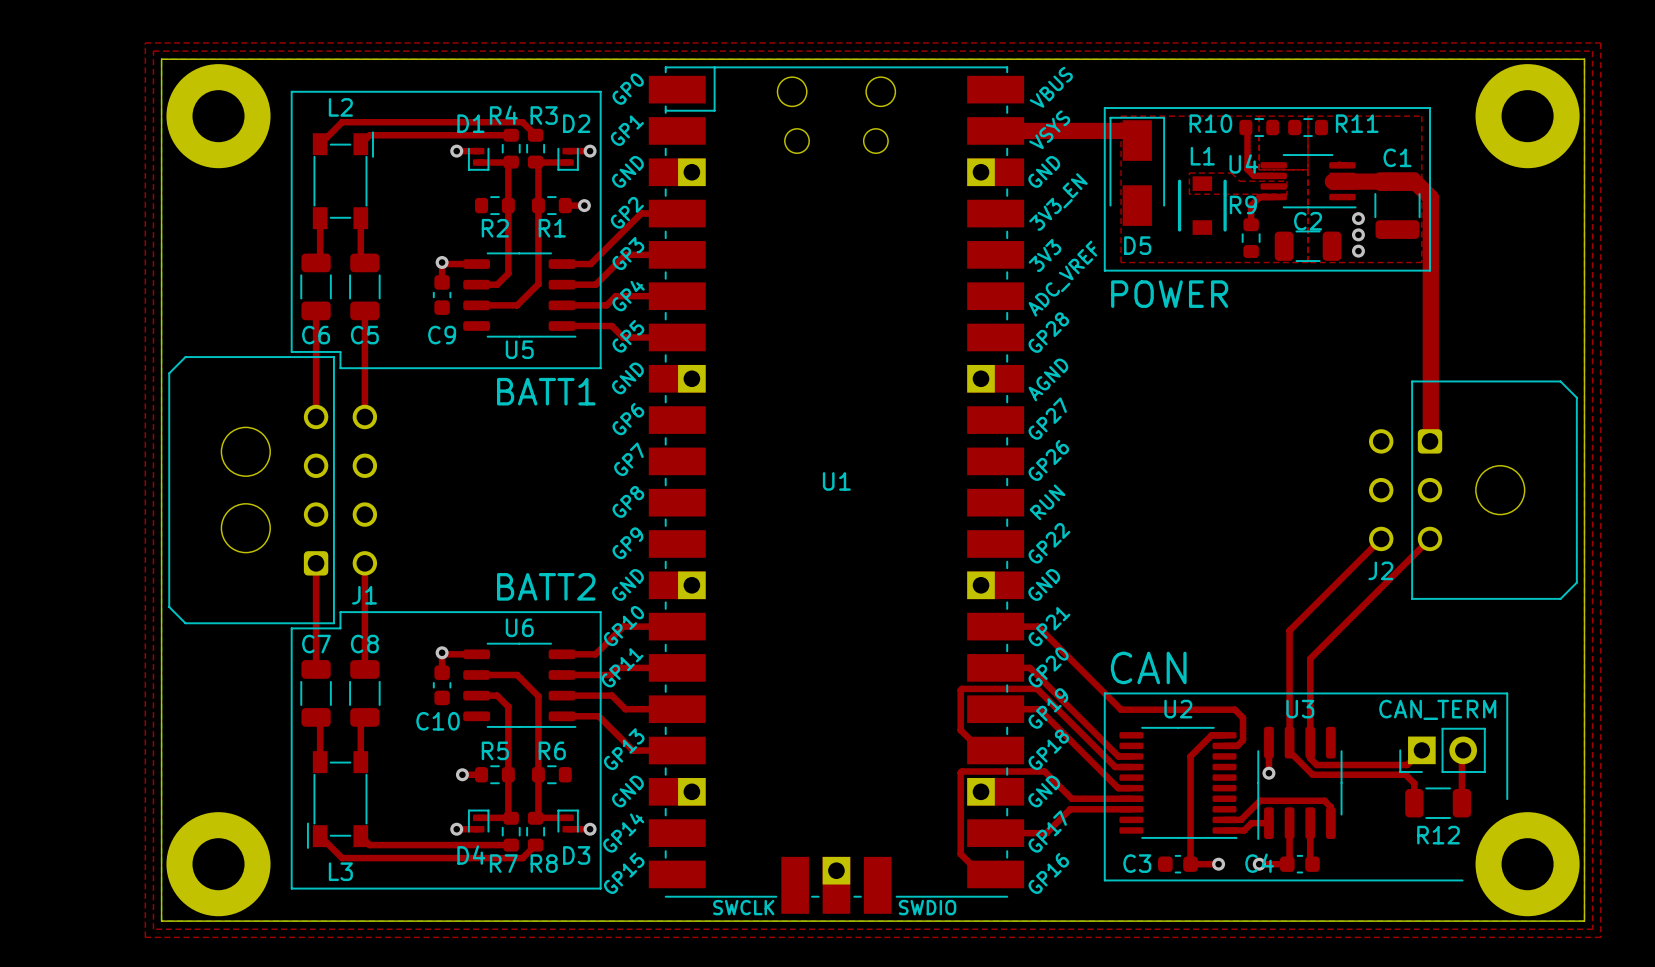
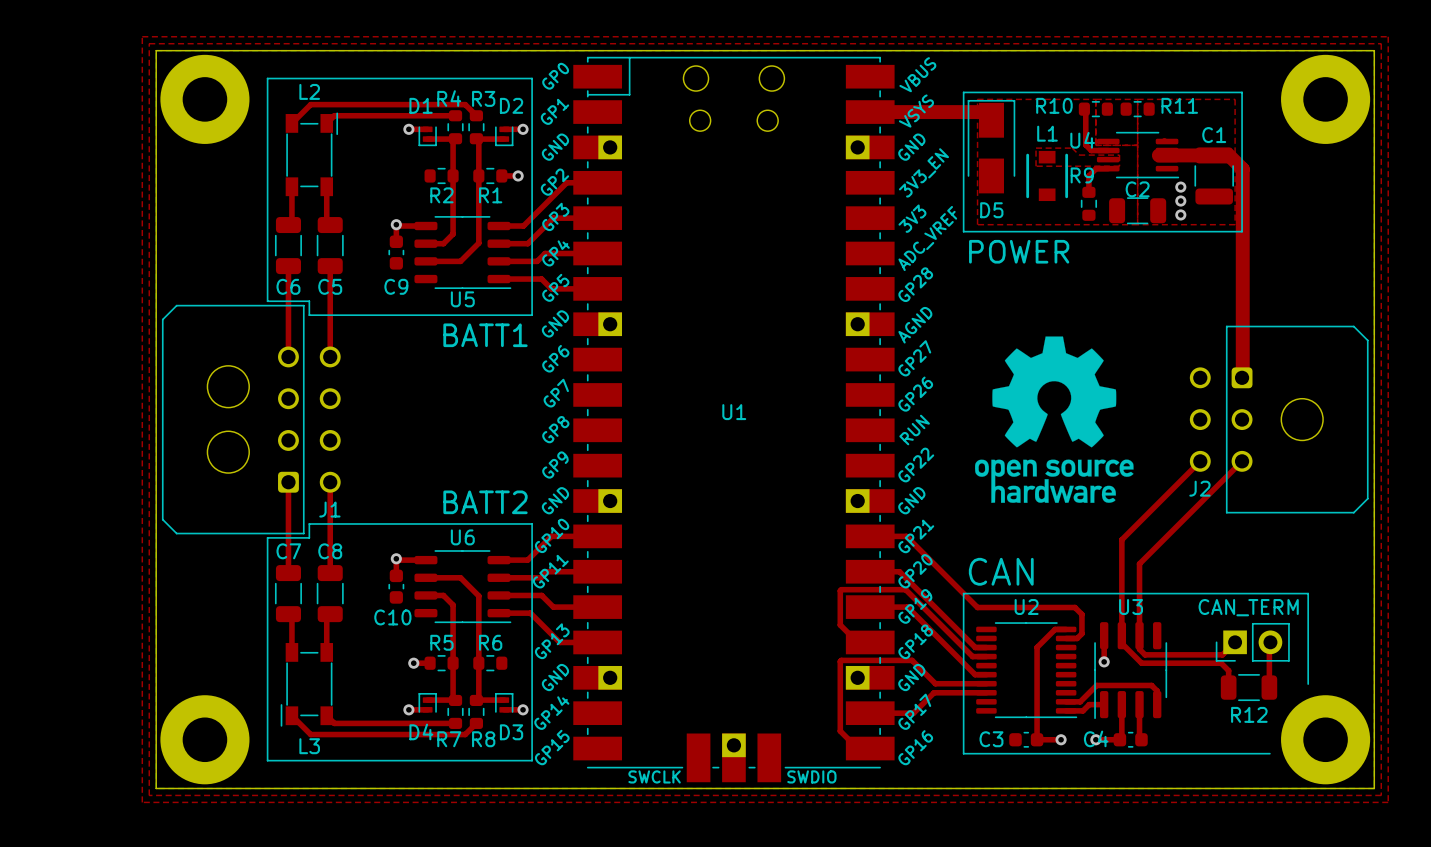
drawing: none -> [975, 336, 1134, 503]

